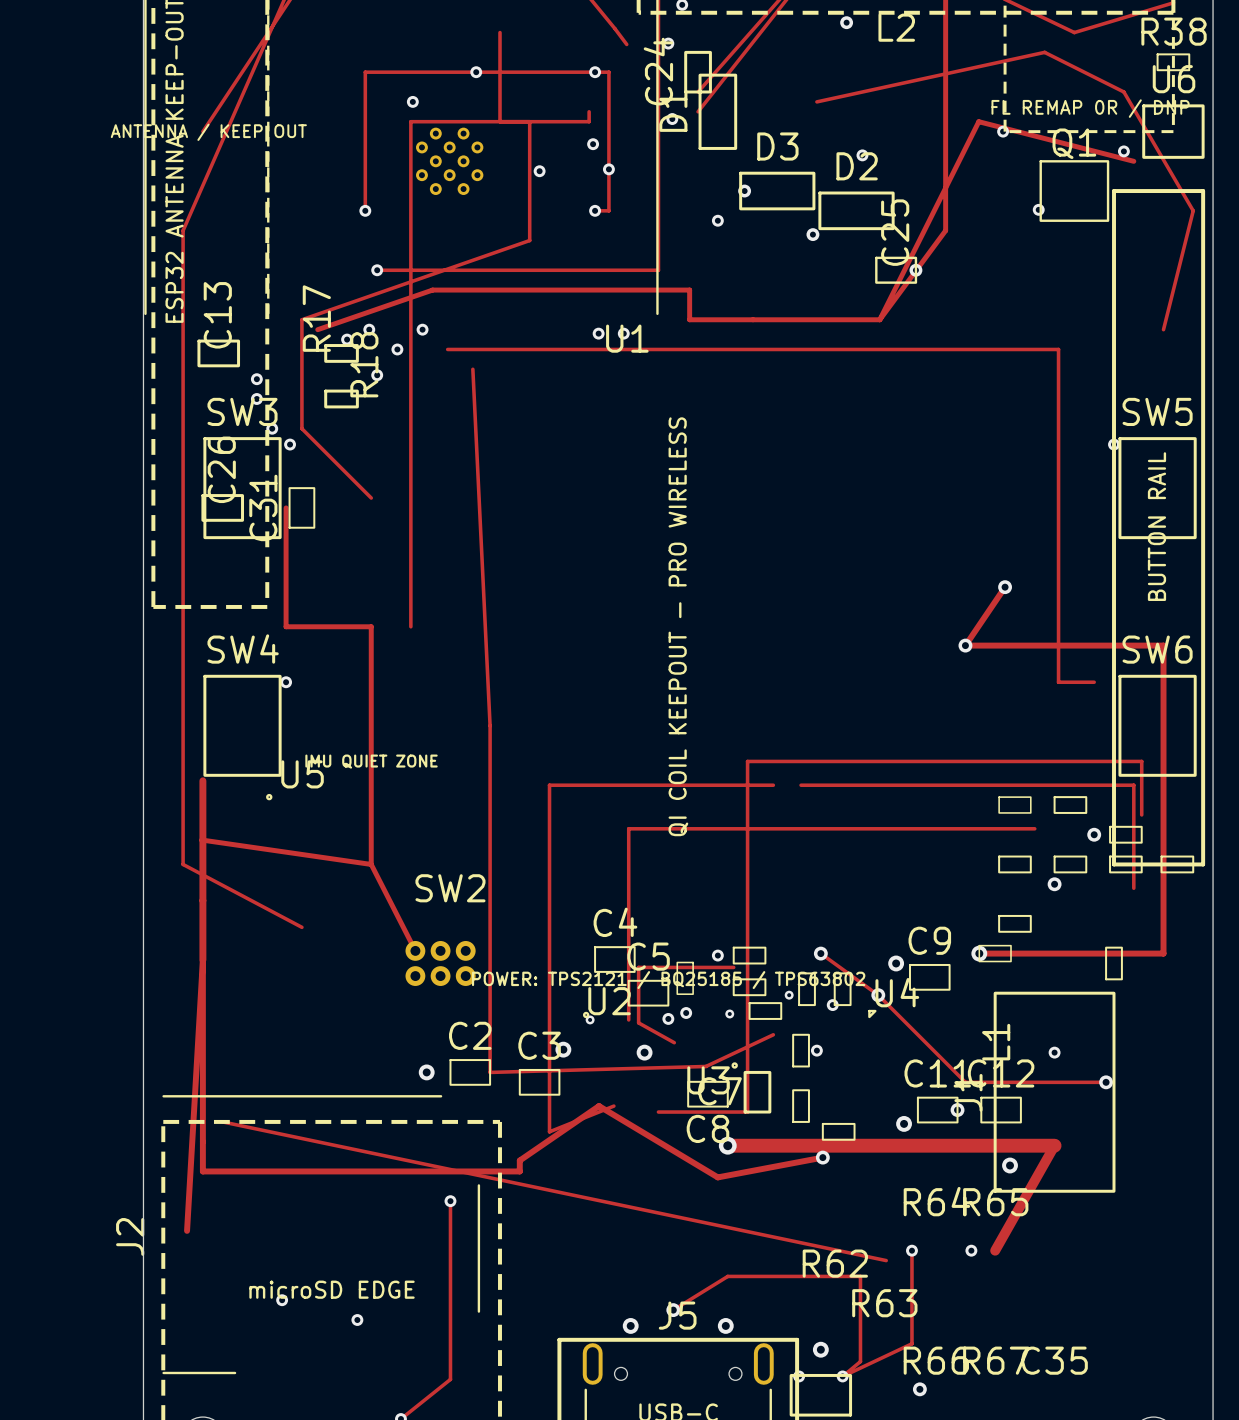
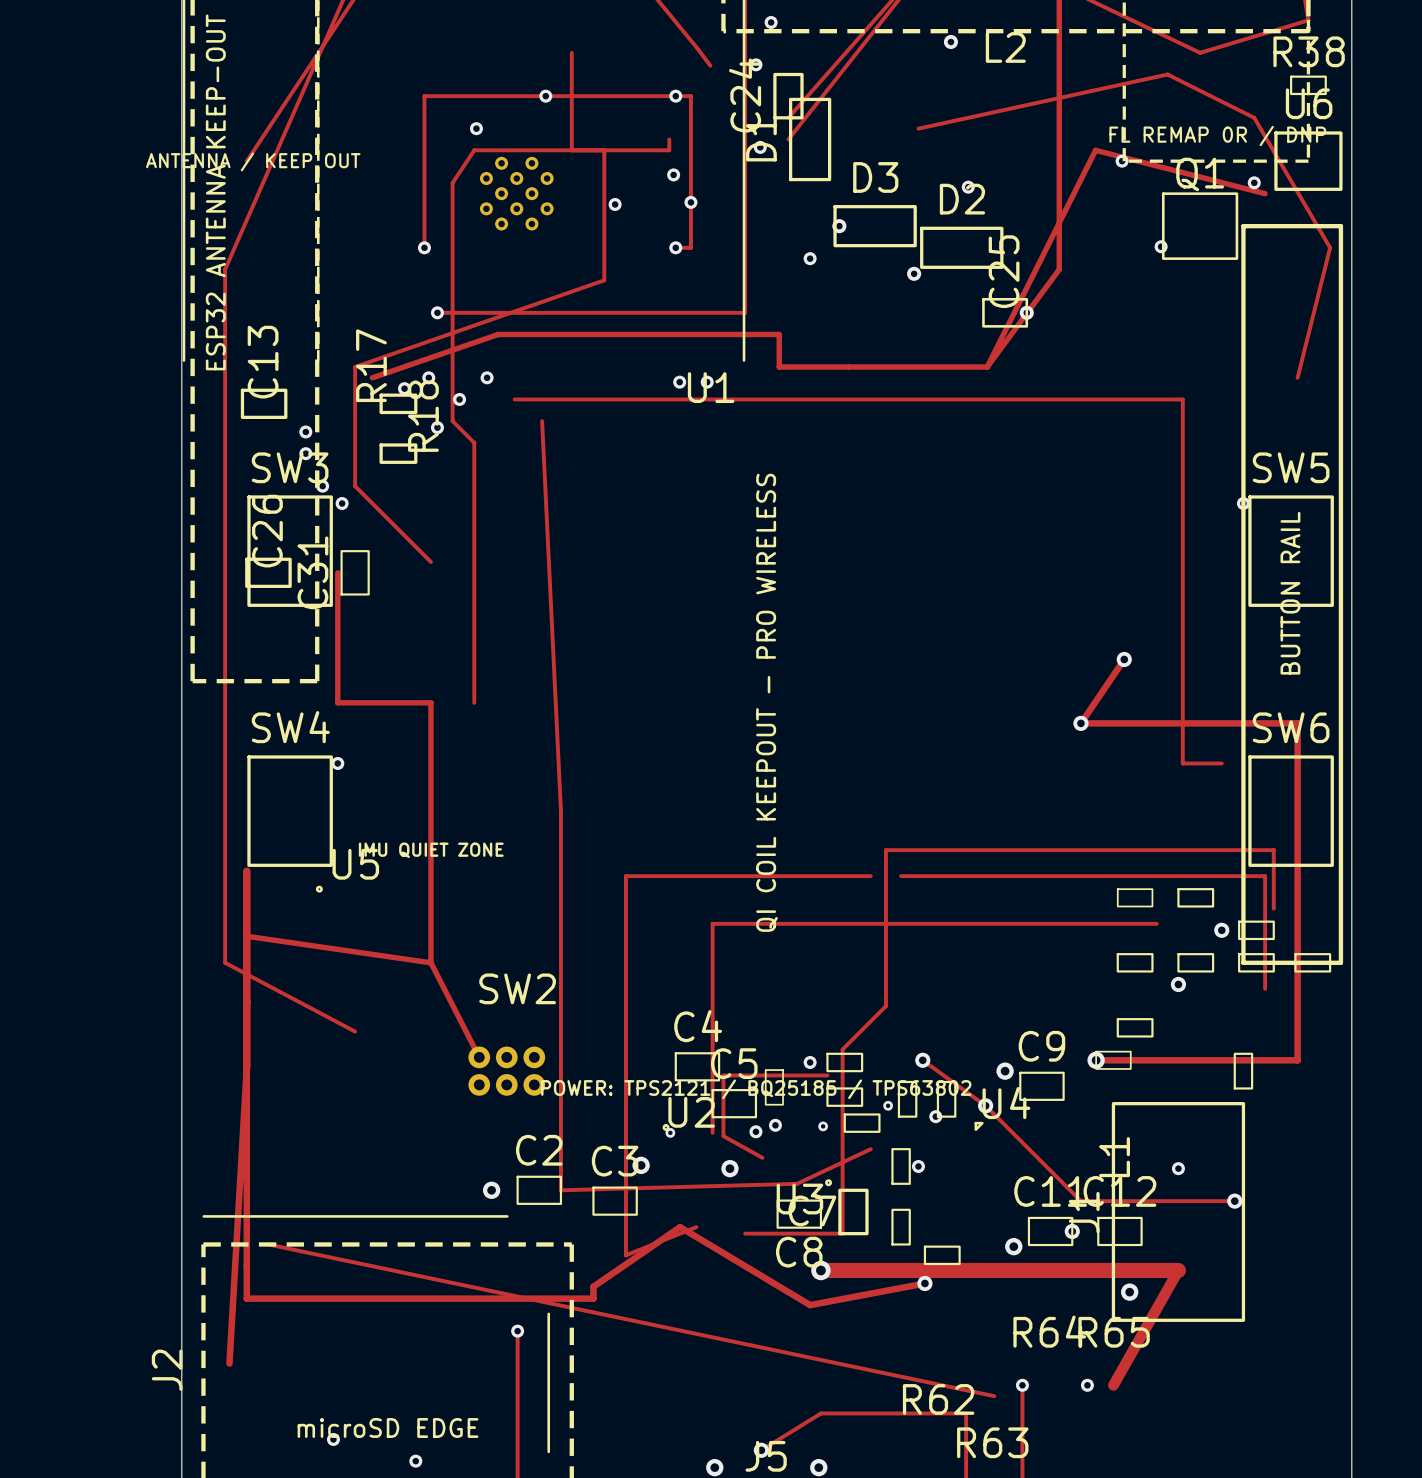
track: (410, 121) (410, 389) -> (474, 150) (452, 182) (452, 421) (474, 442)
track: (787, 761) (747, 761) (747, 943) -> (885, 850) (885, 1006) (842, 1049)

